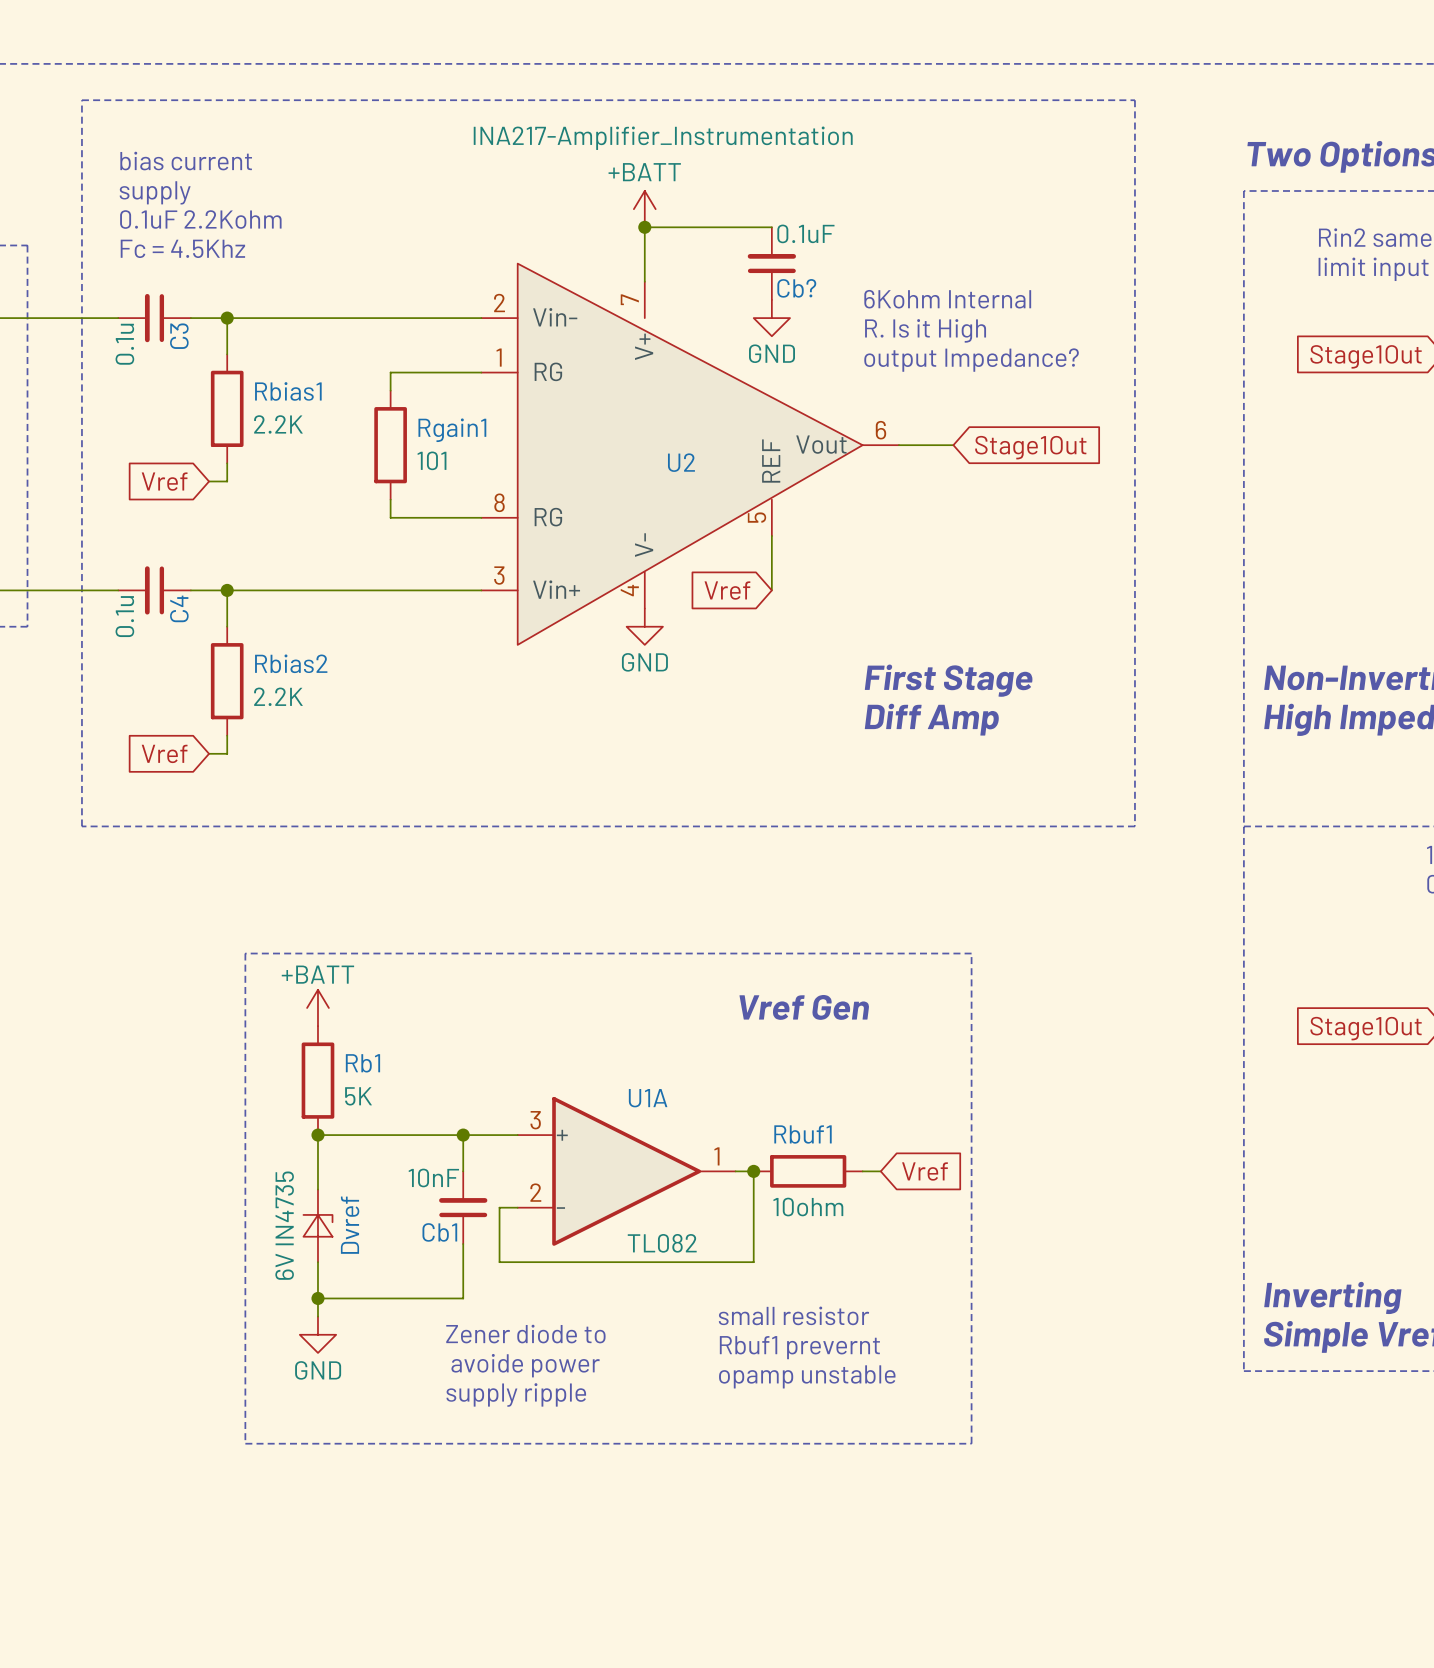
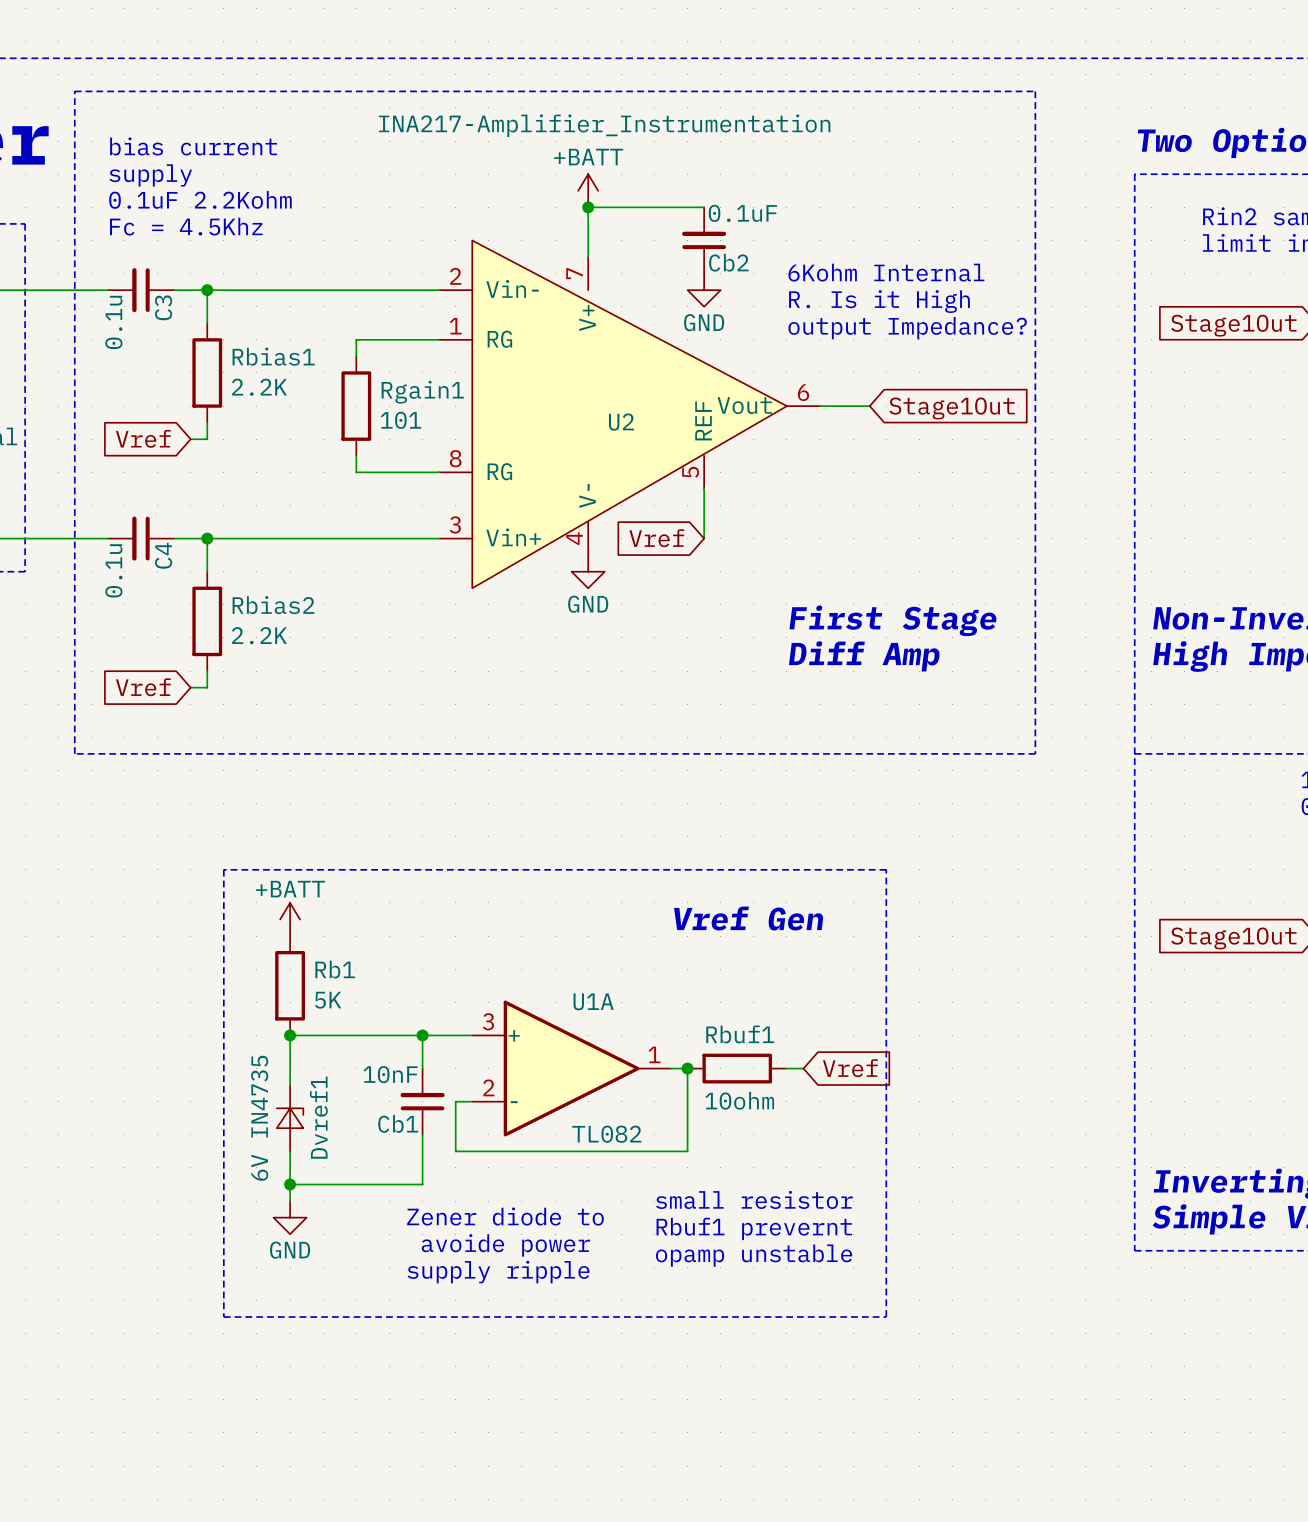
Cb? name: Cb? (796, 288) -> Cb2 (728, 262)
Dvref name: Dvref (350, 1225) -> Dvref1 (318, 1117)

